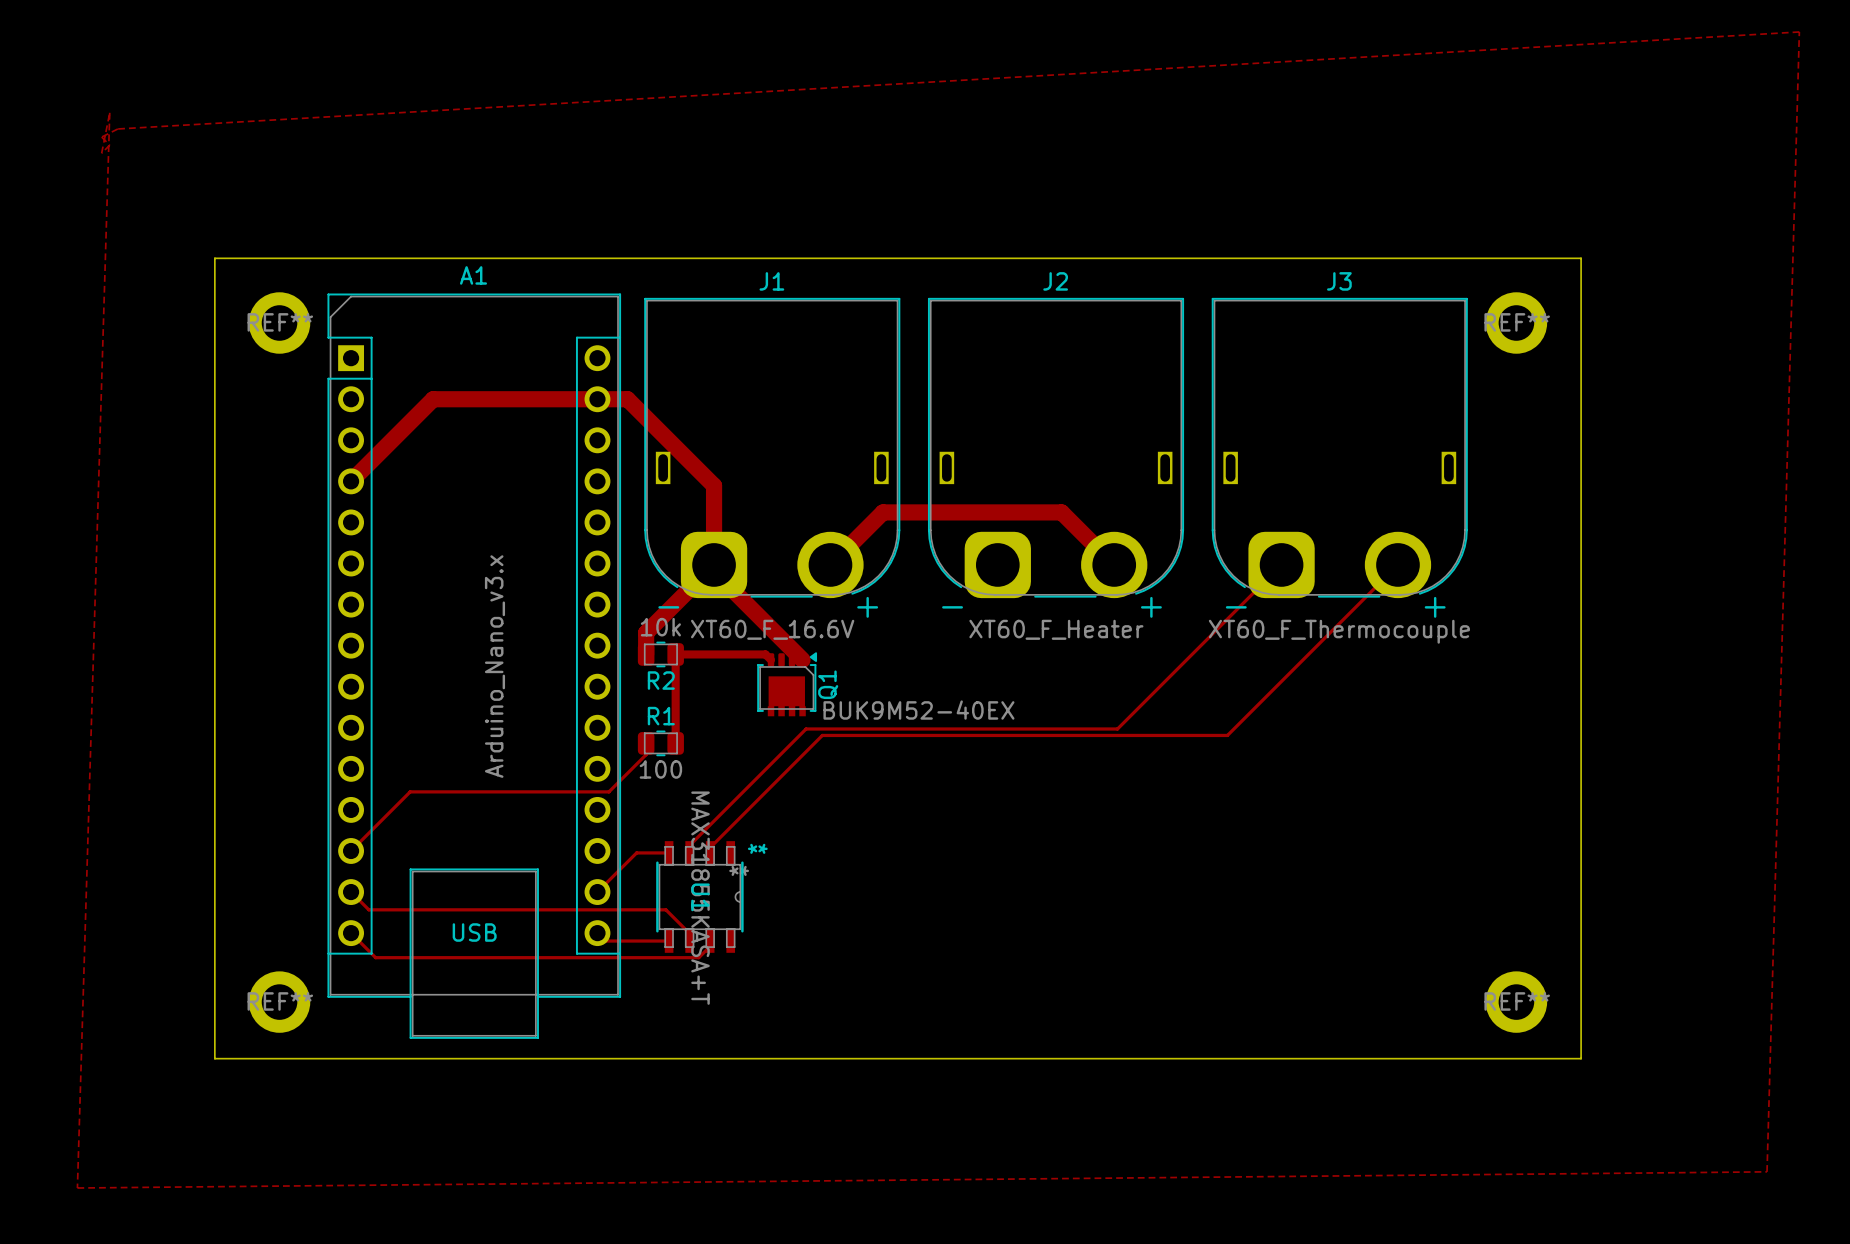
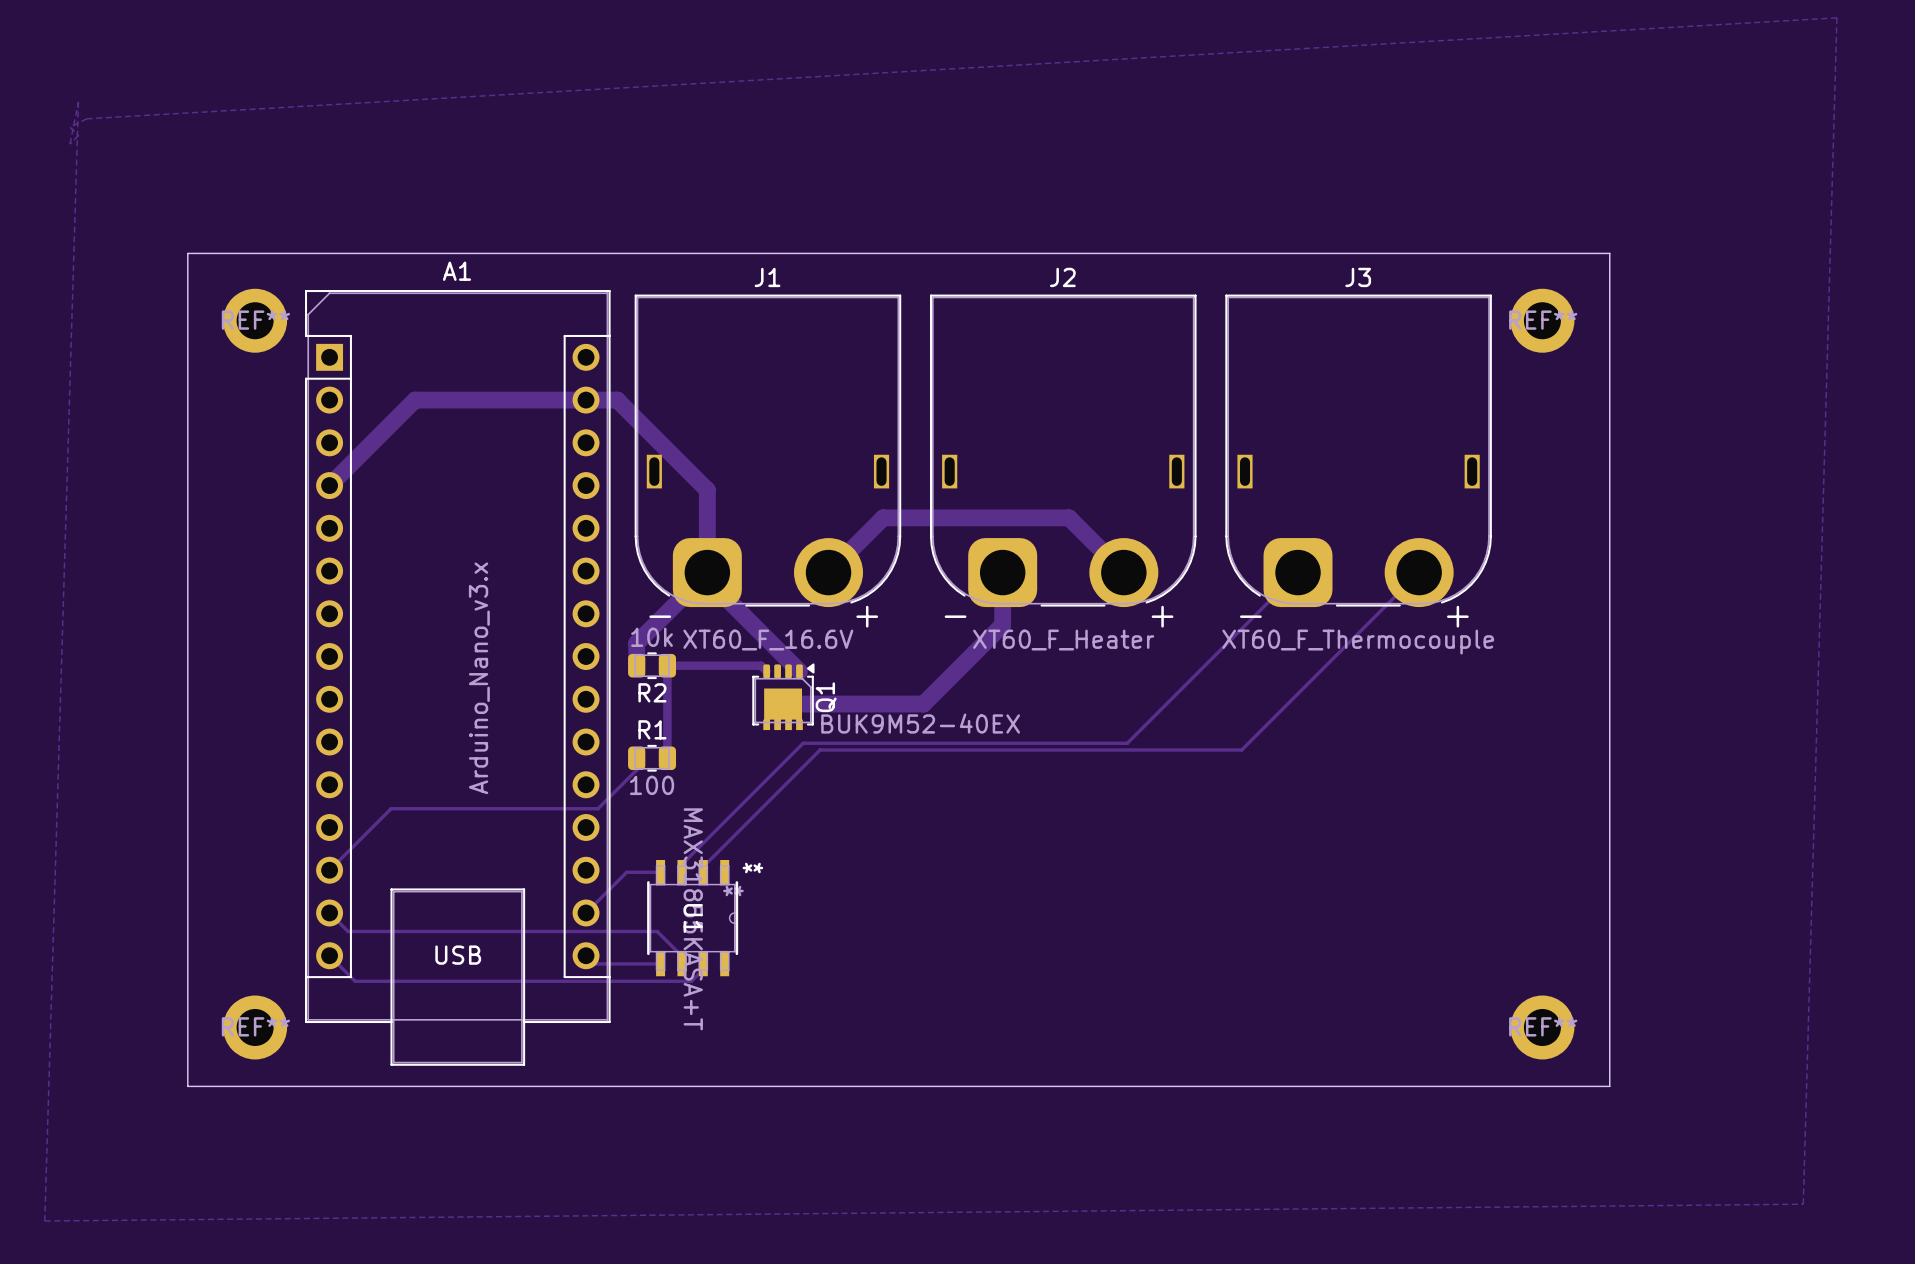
track: none -> (1002, 572) (1002, 624) (923, 704) (783, 704)

